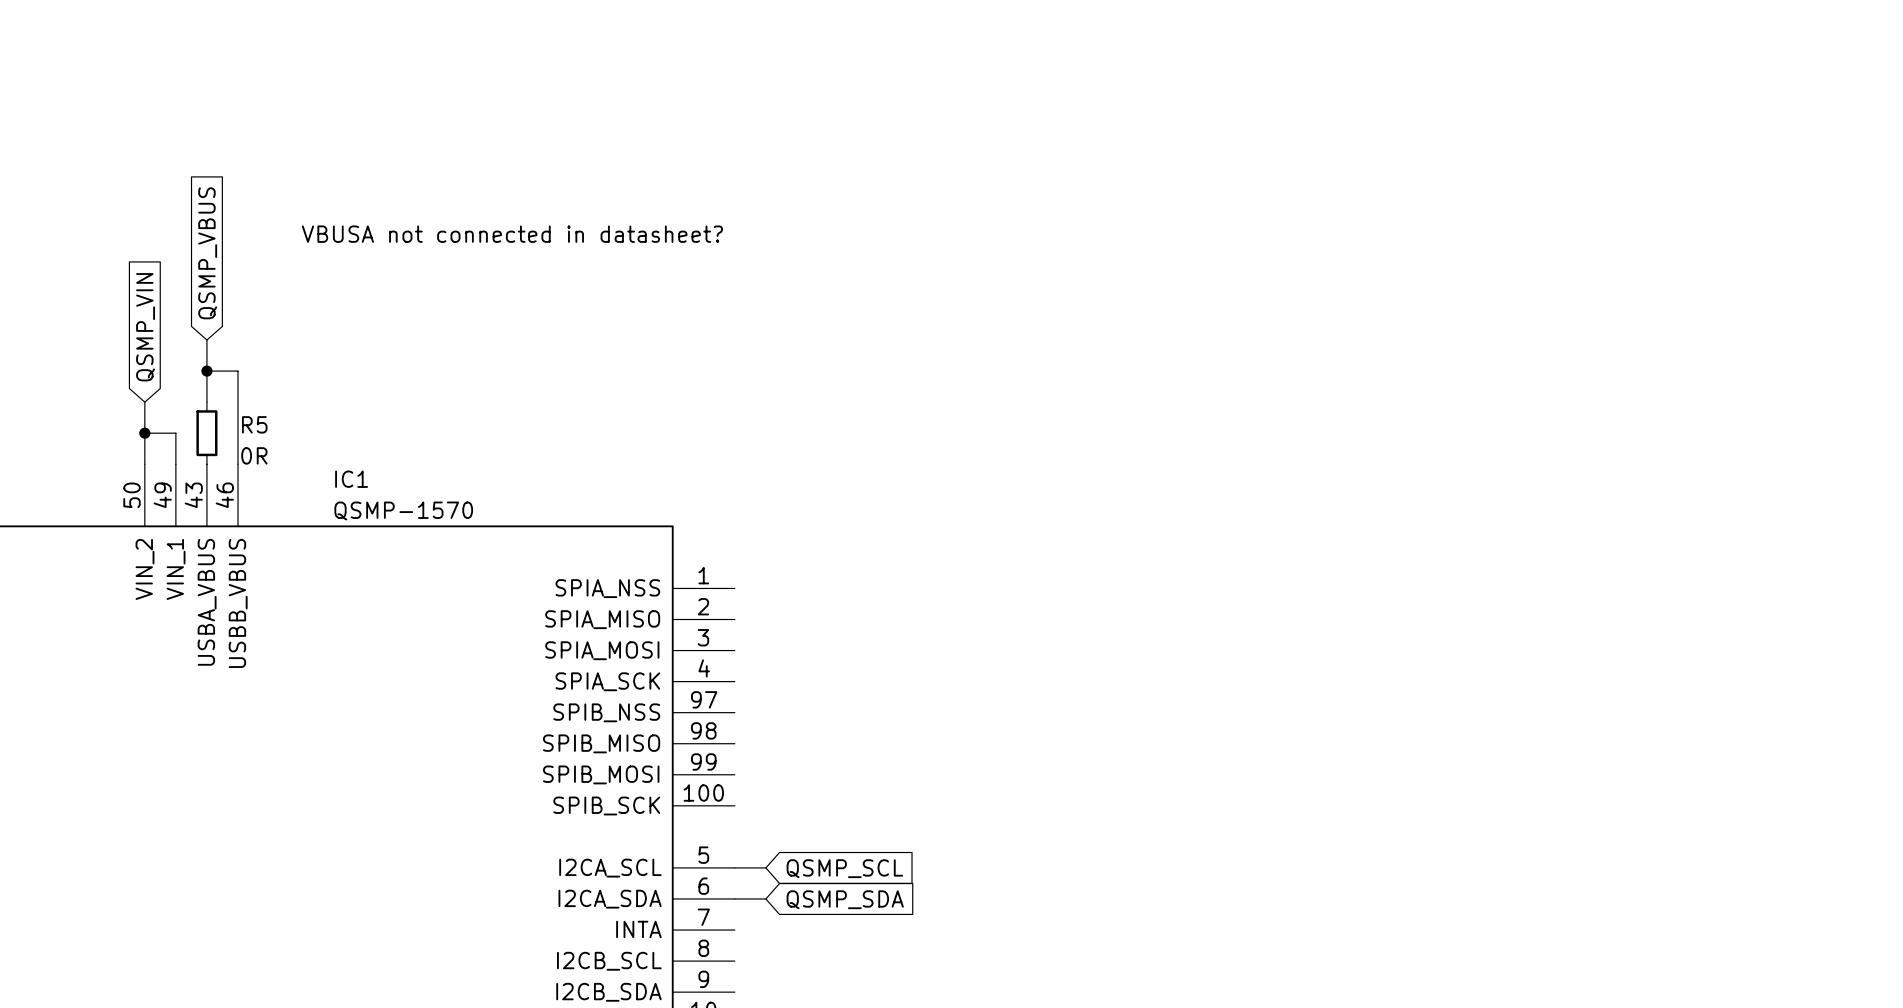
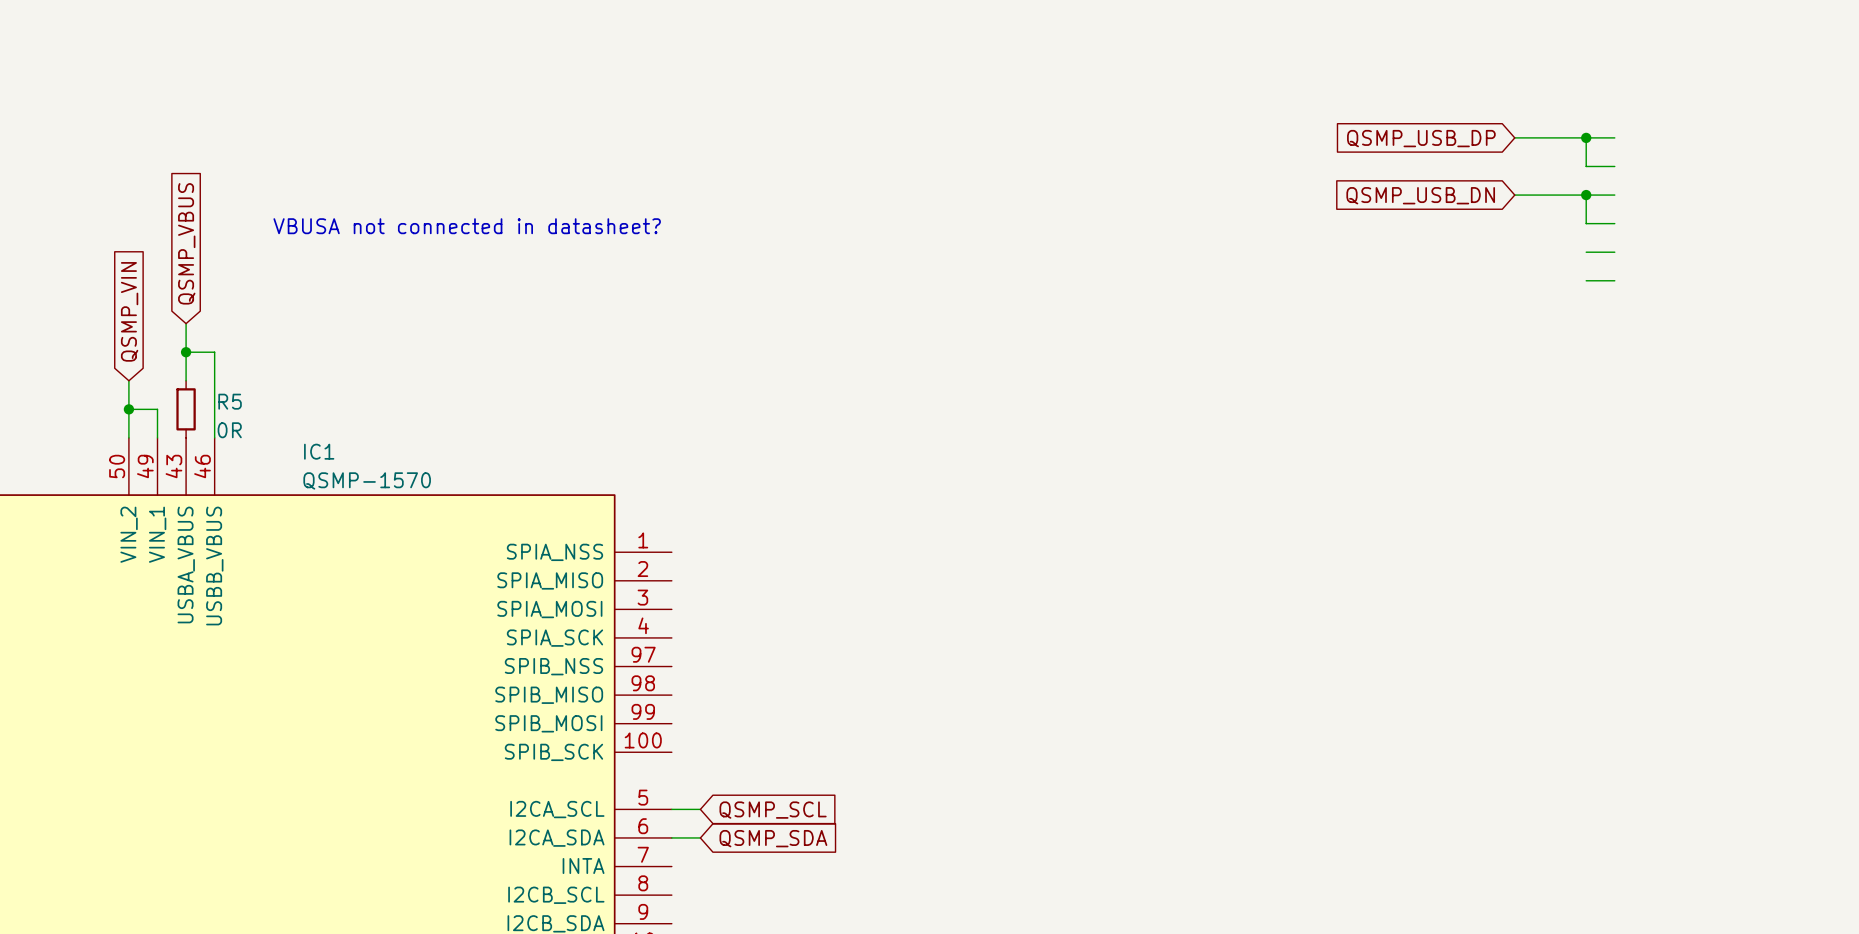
global label: none -> QSMP_USB_DP (1421, 138)
wire: none -> (1514, 137) (1614, 137)
wire: none -> (1586, 137) (1586, 166) (1614, 166)
junction: none -> (1586, 137)
wire: none -> (1514, 195) (1614, 195)
wire: none -> (1586, 195) (1586, 223) (1614, 223)
junction: none -> (1586, 195)
global label: none -> QSMP_USB_DN (1420, 195)
wire: none -> (1586, 252) (1614, 252)
wire: none -> (1586, 280) (1614, 280)

